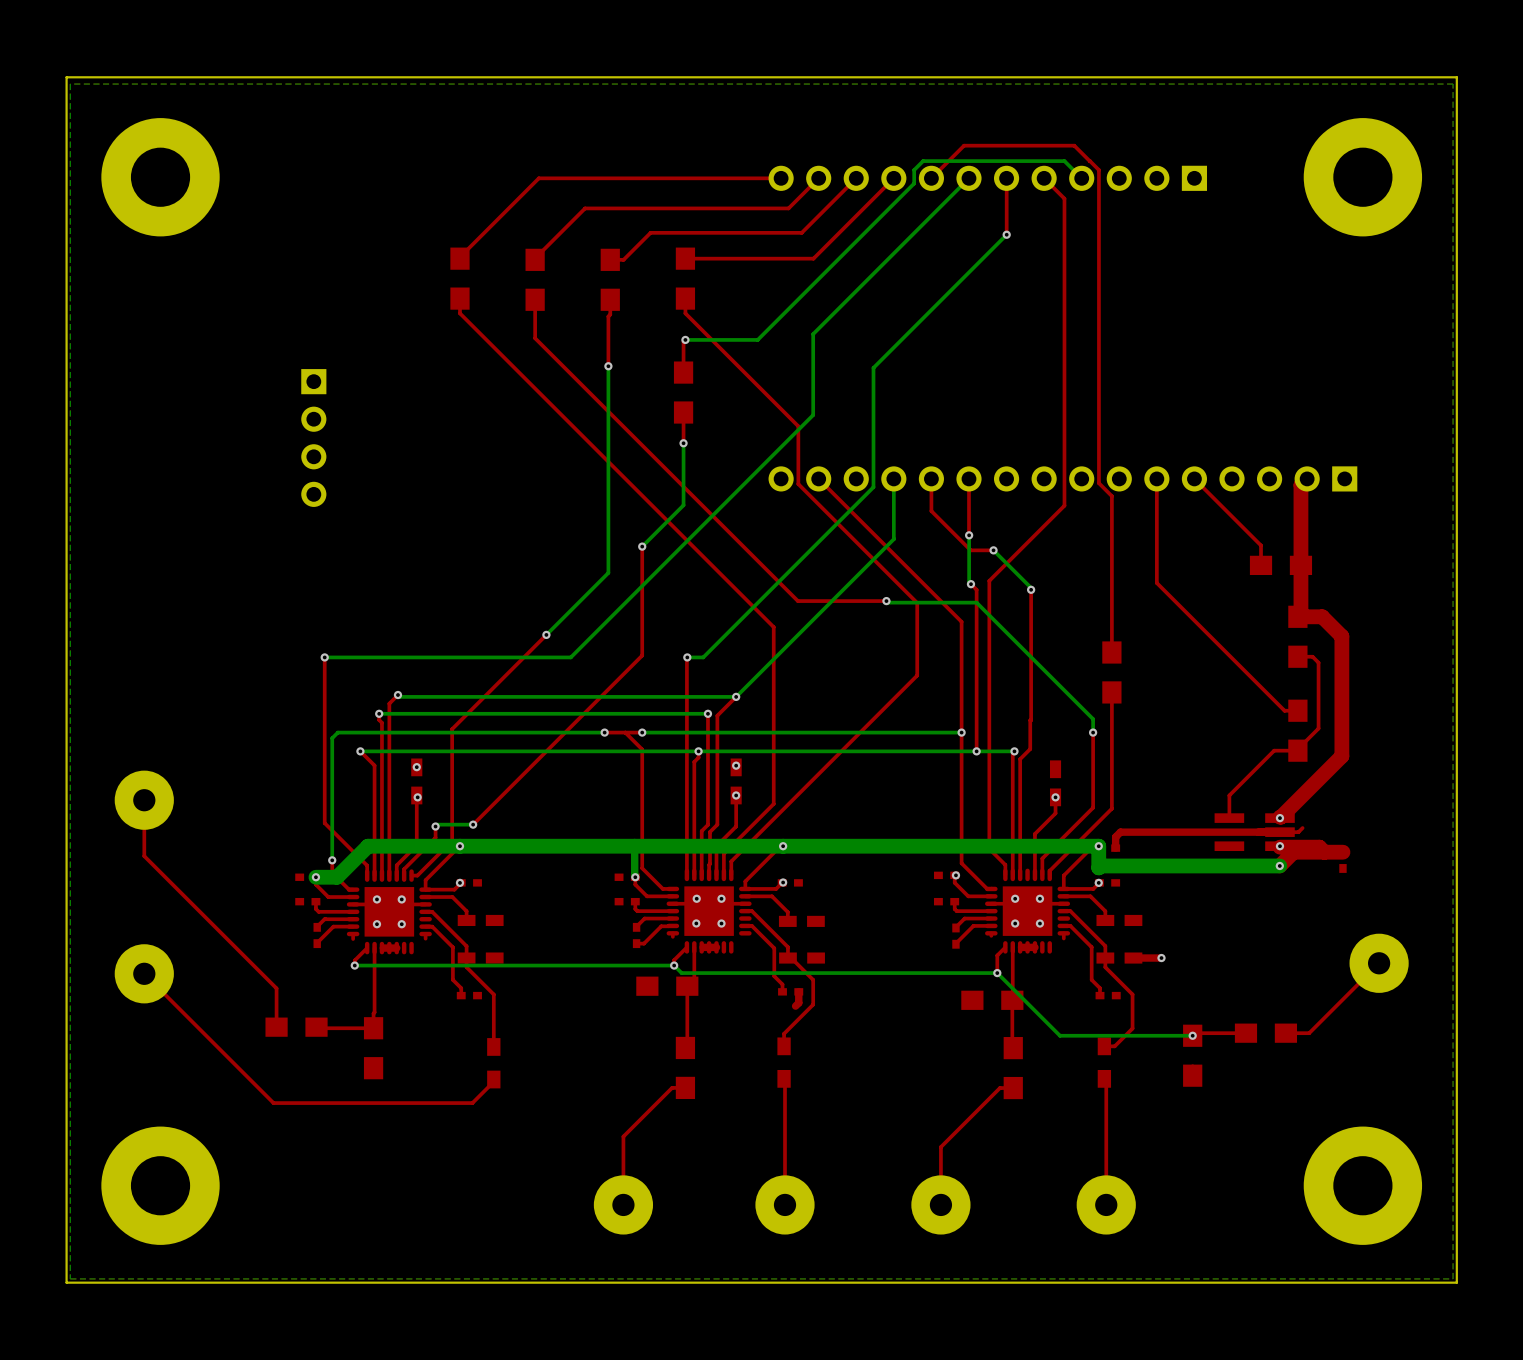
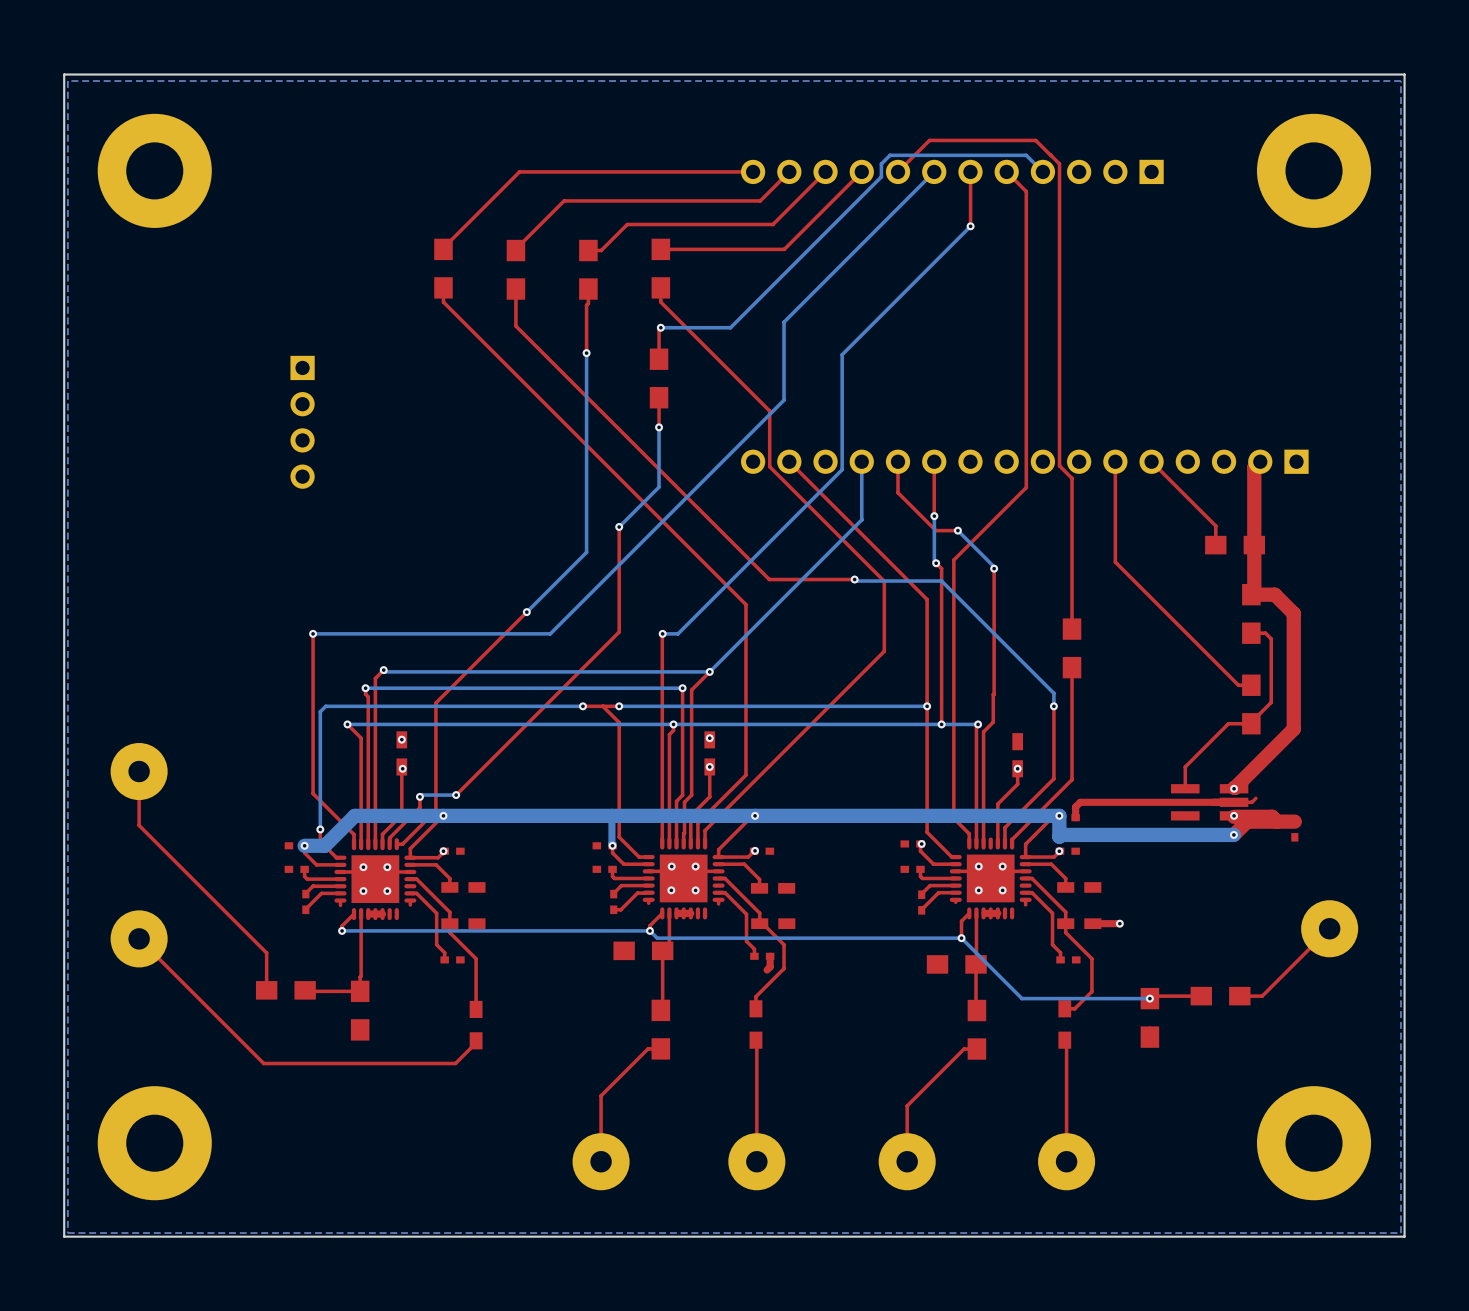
top track: none -> (718, 899) (718, 903)

